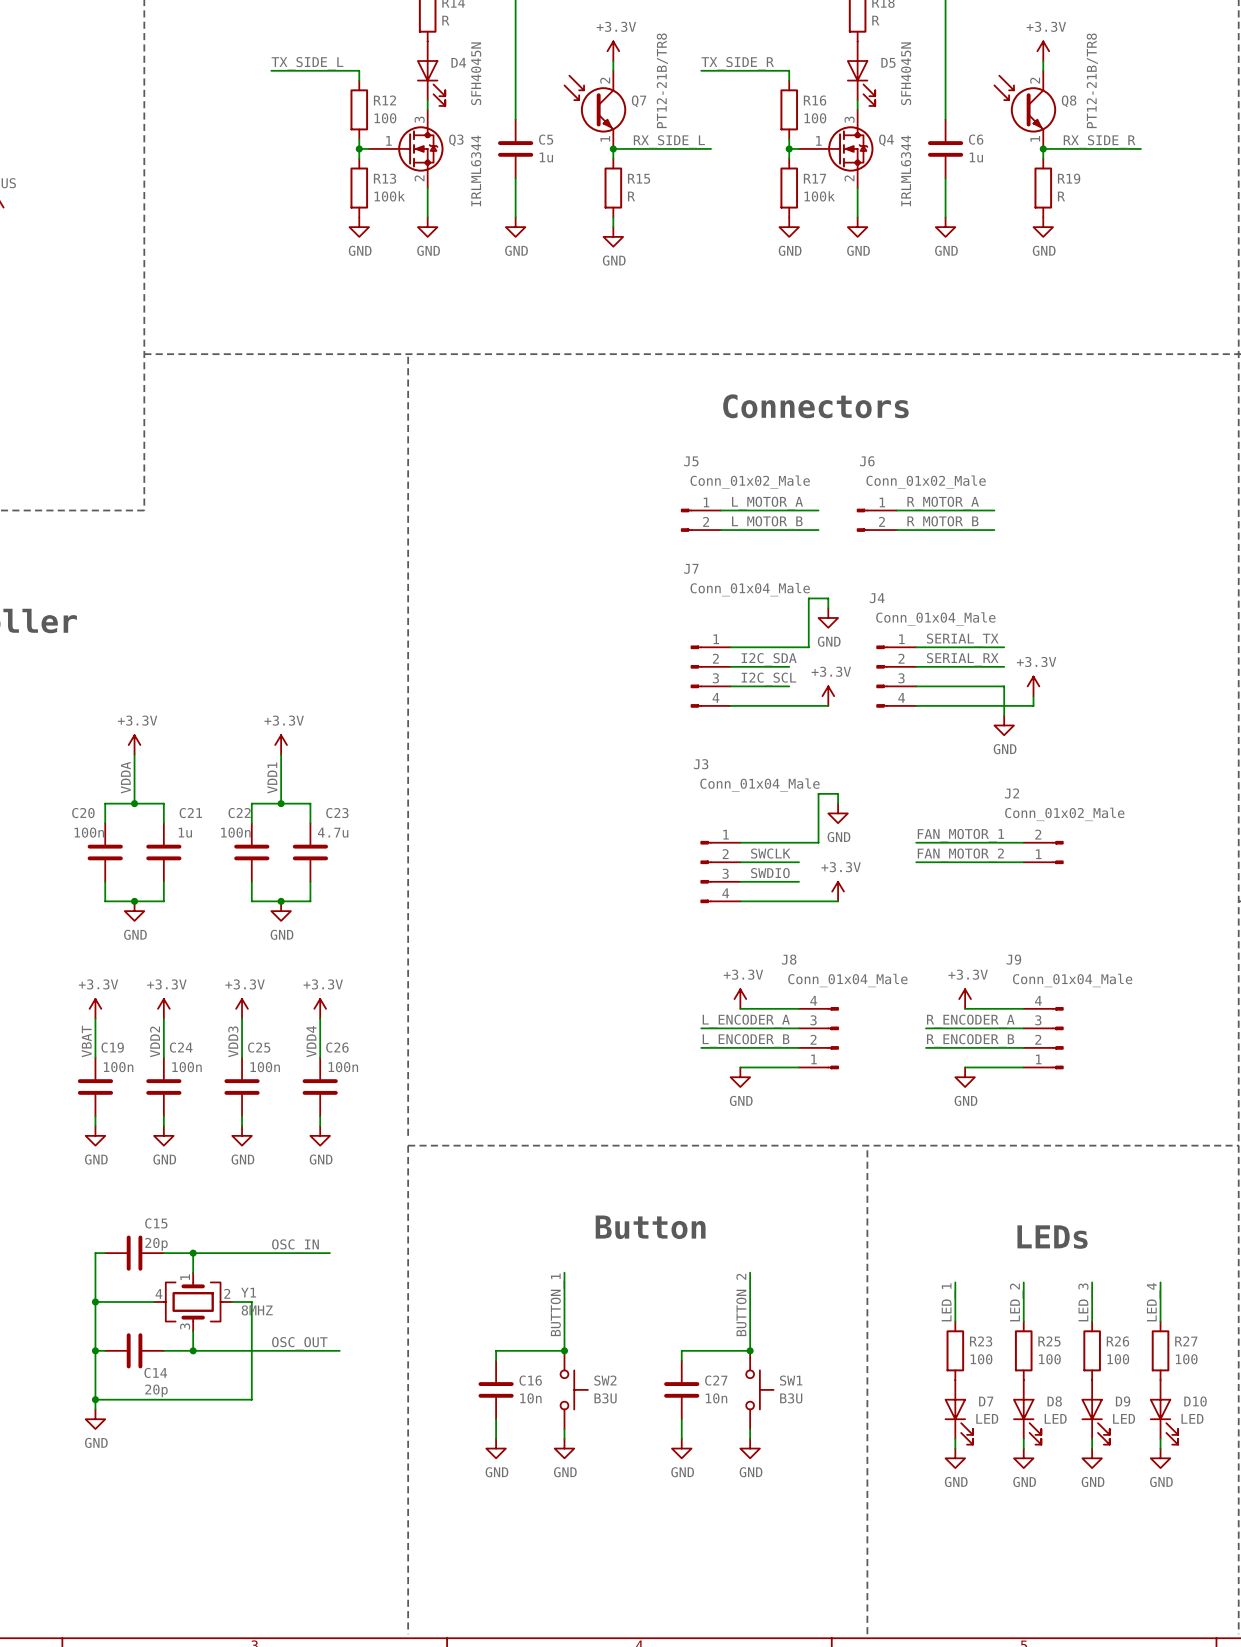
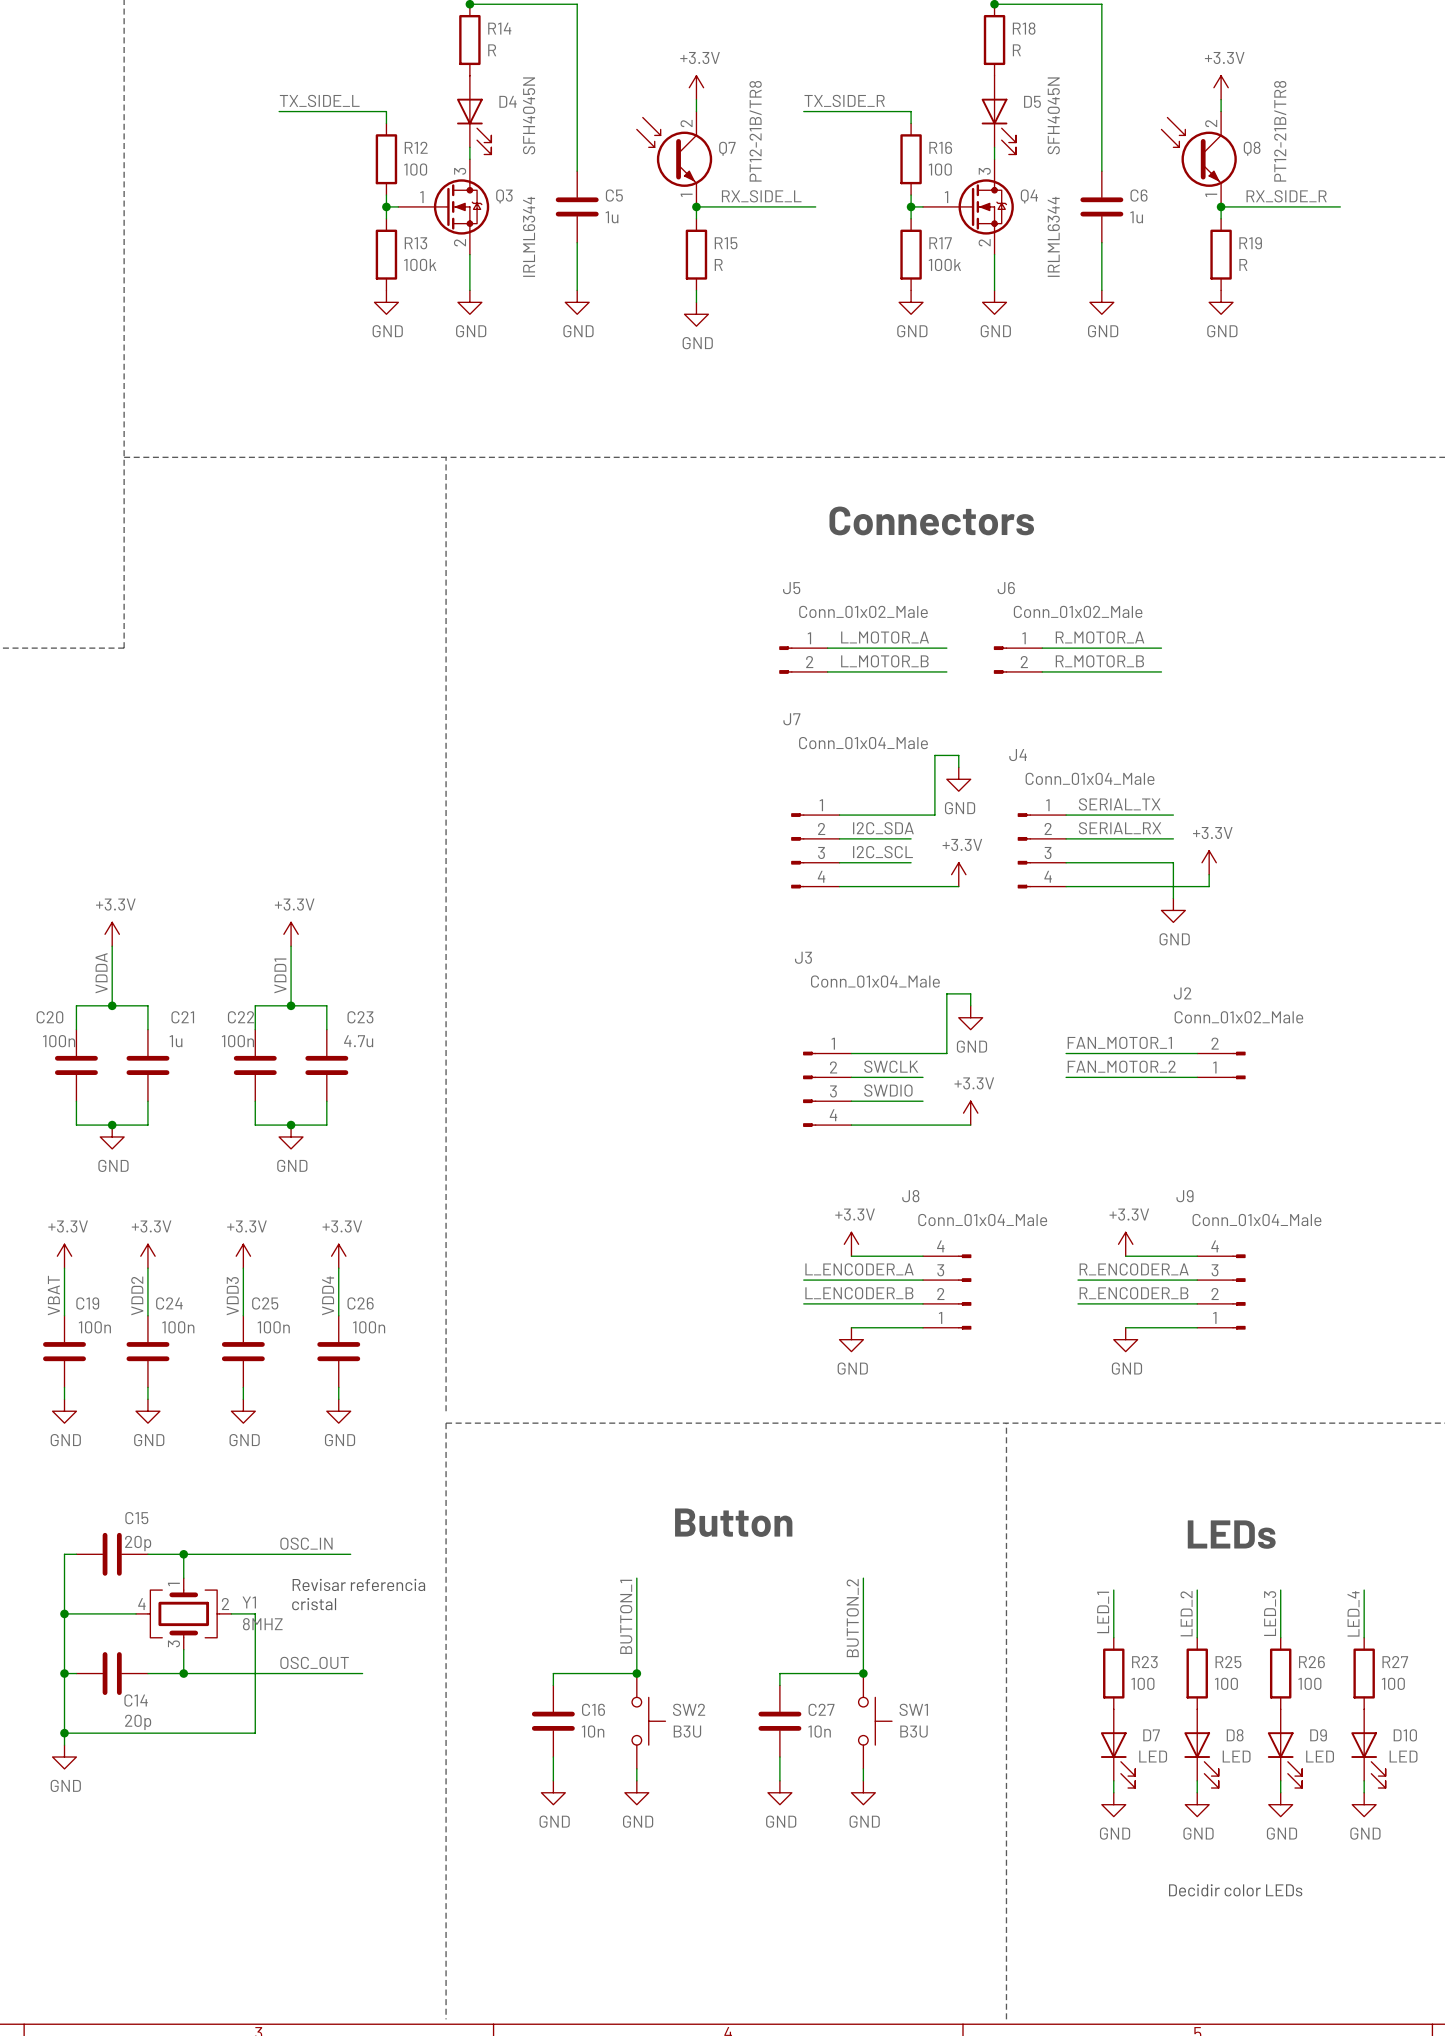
text: none -> Revisar referencia (358, 1584)
text: none -> cristal (314, 1604)
text: none -> Decidir color LEDs (1235, 1890)

